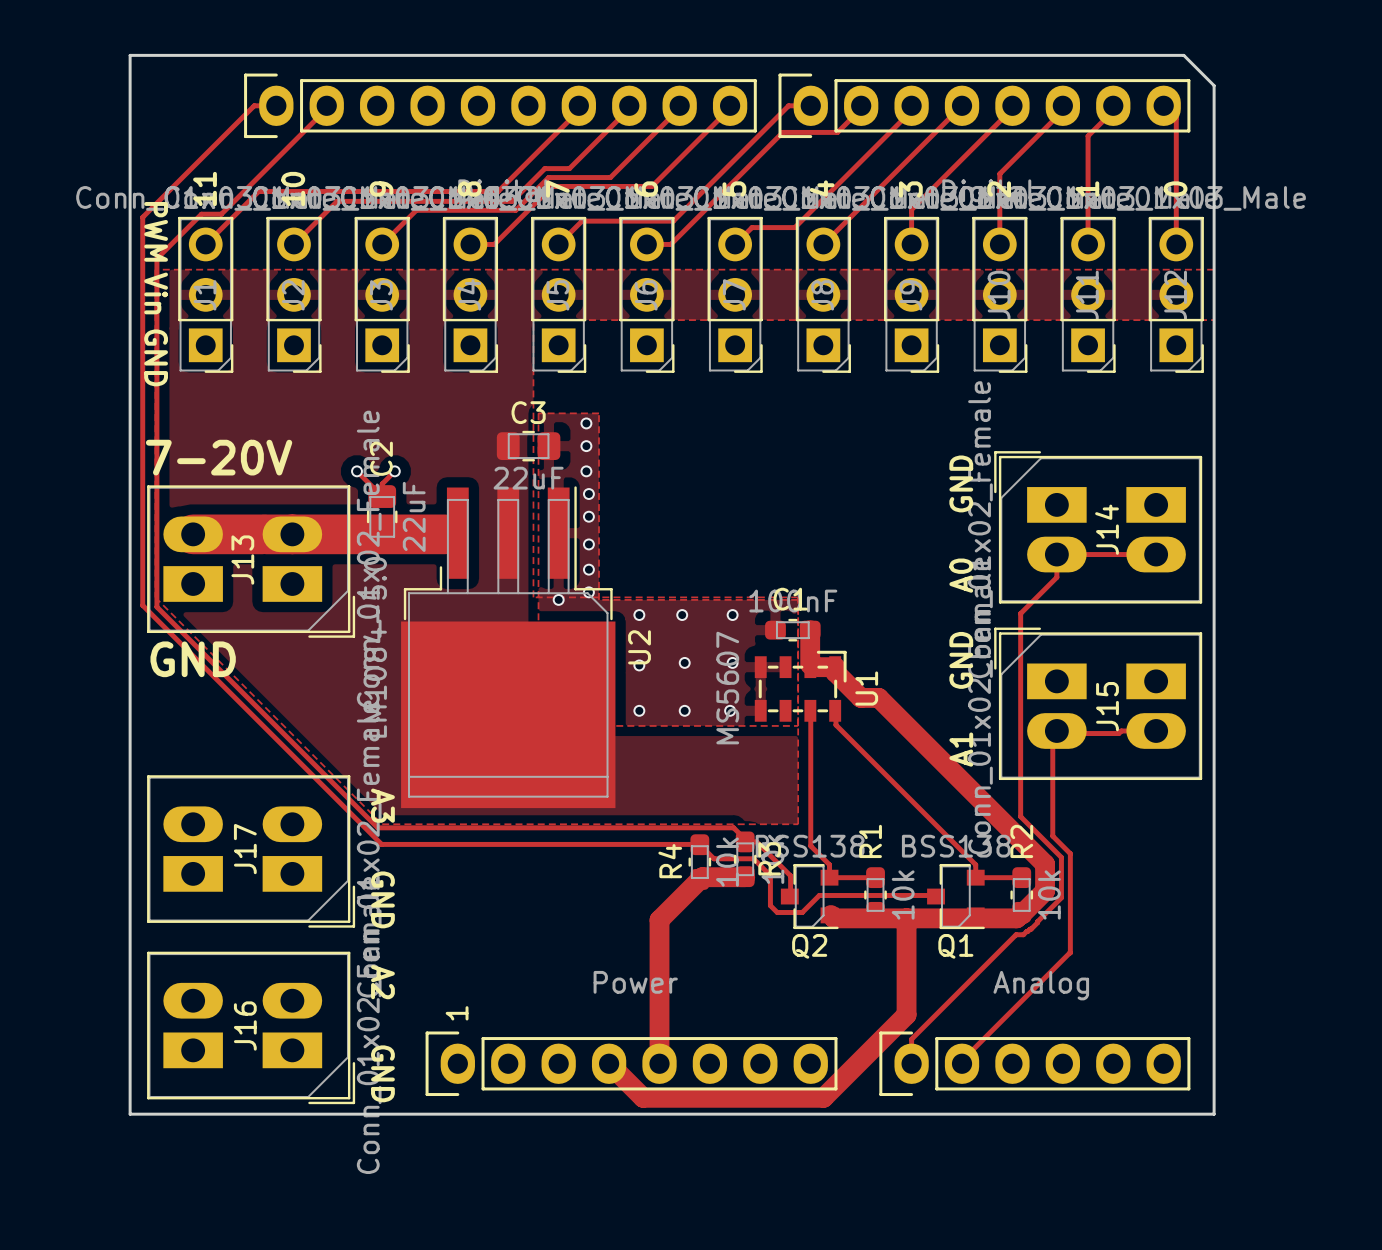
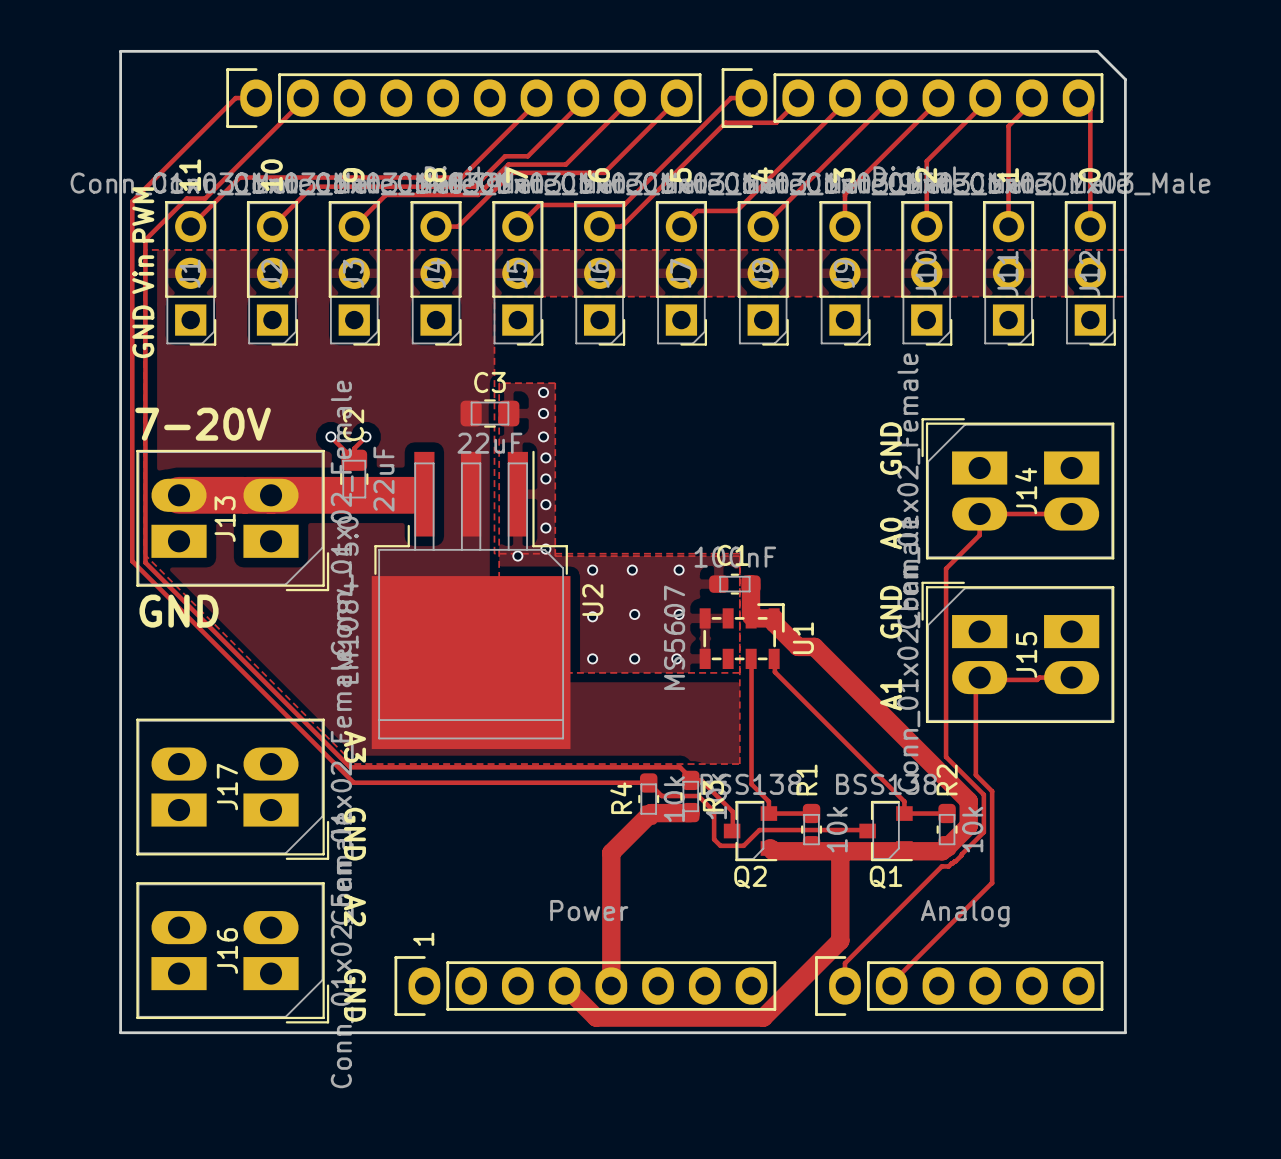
text rotation: 0° (156, 231) -> 180° (143, 214)
text rotation: 0° (156, 293) -> 180° (143, 274)
text rotation: 0° (156, 357) -> 180° (143, 331)

